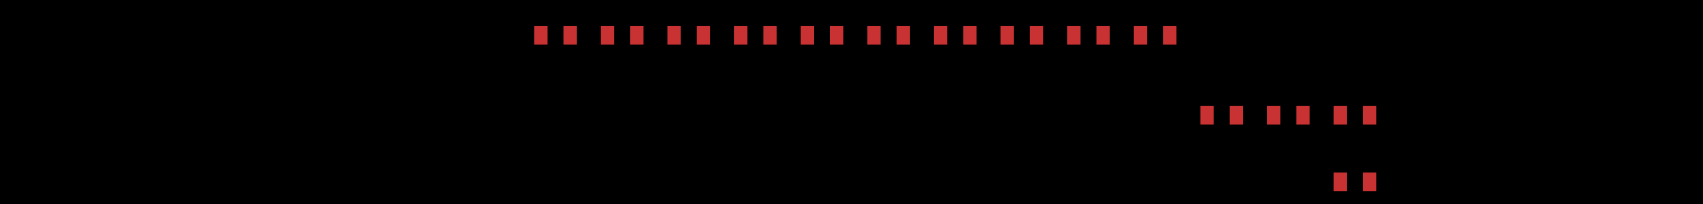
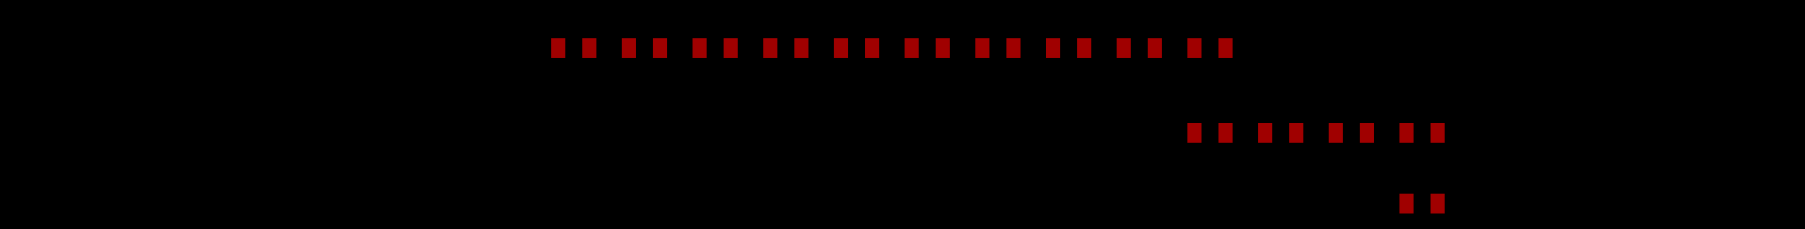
part: none -> (1209, 132)

